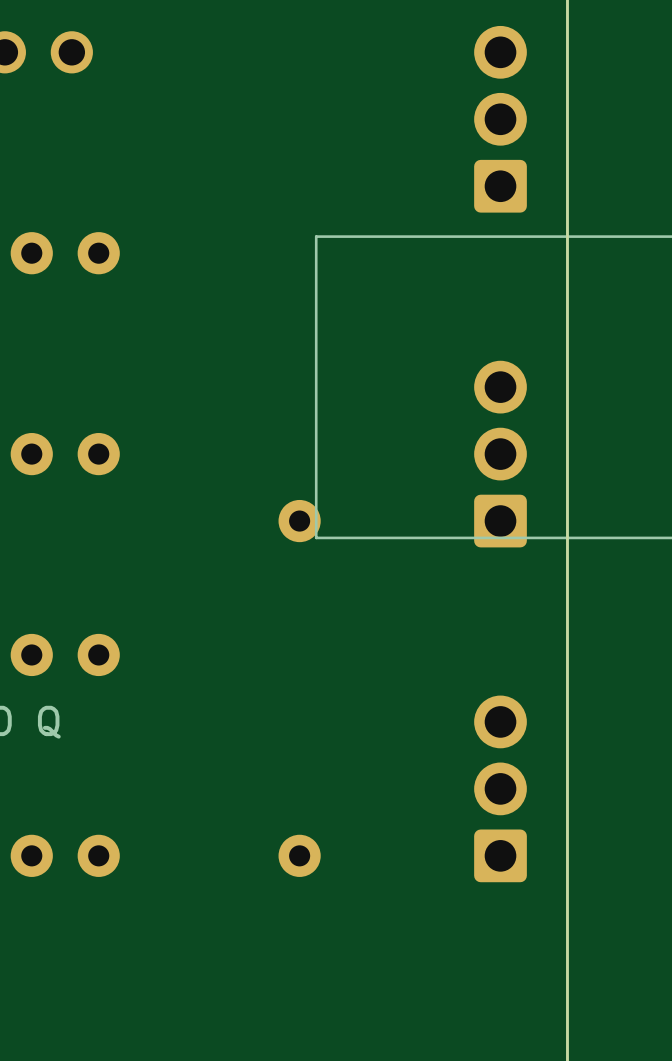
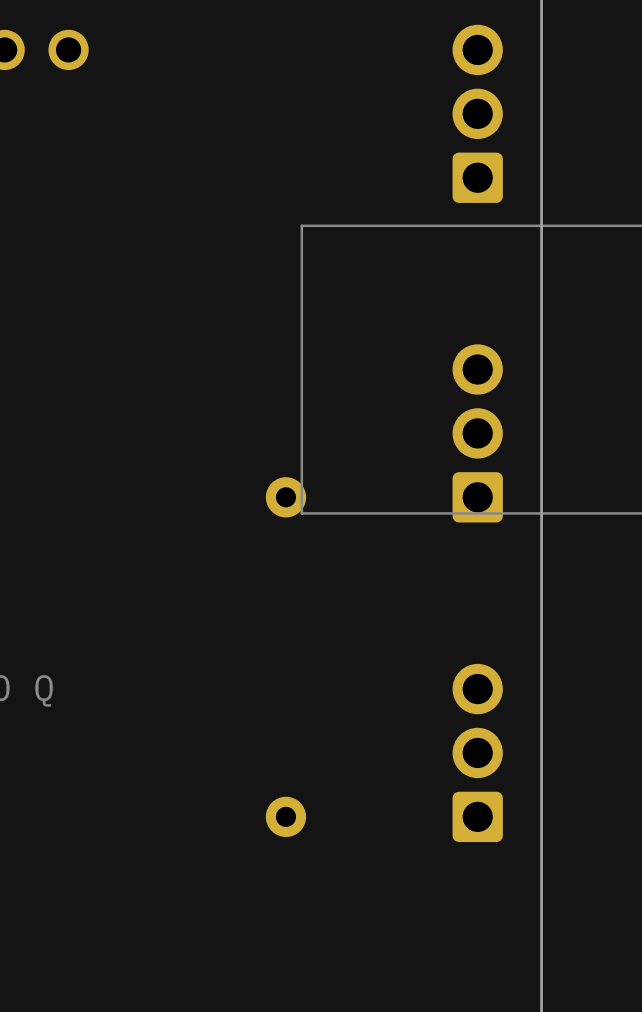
part: (65, 253) -> none
part: (65, 454) -> none
part: (65, 654) -> none
part: (65, 855) -> none

